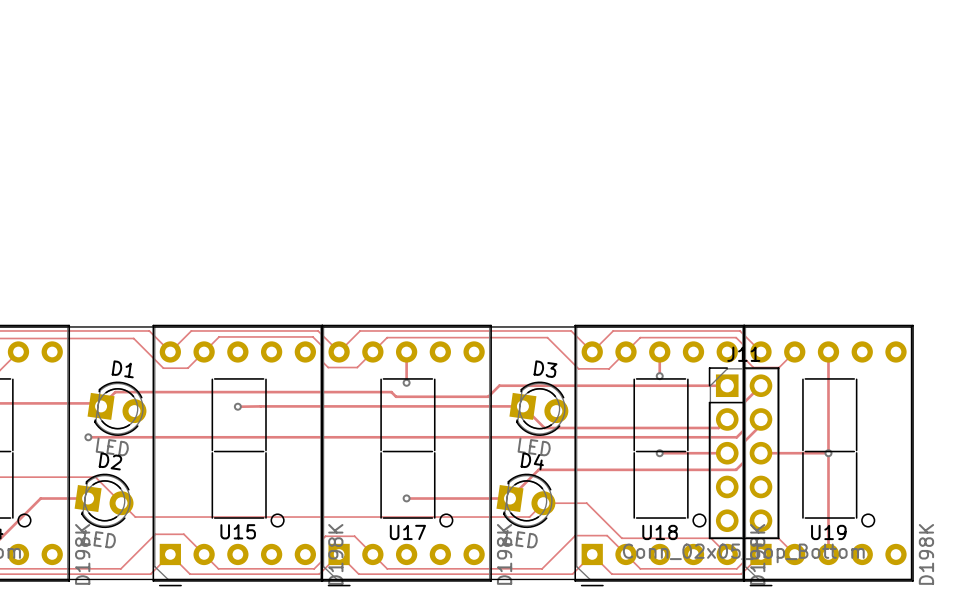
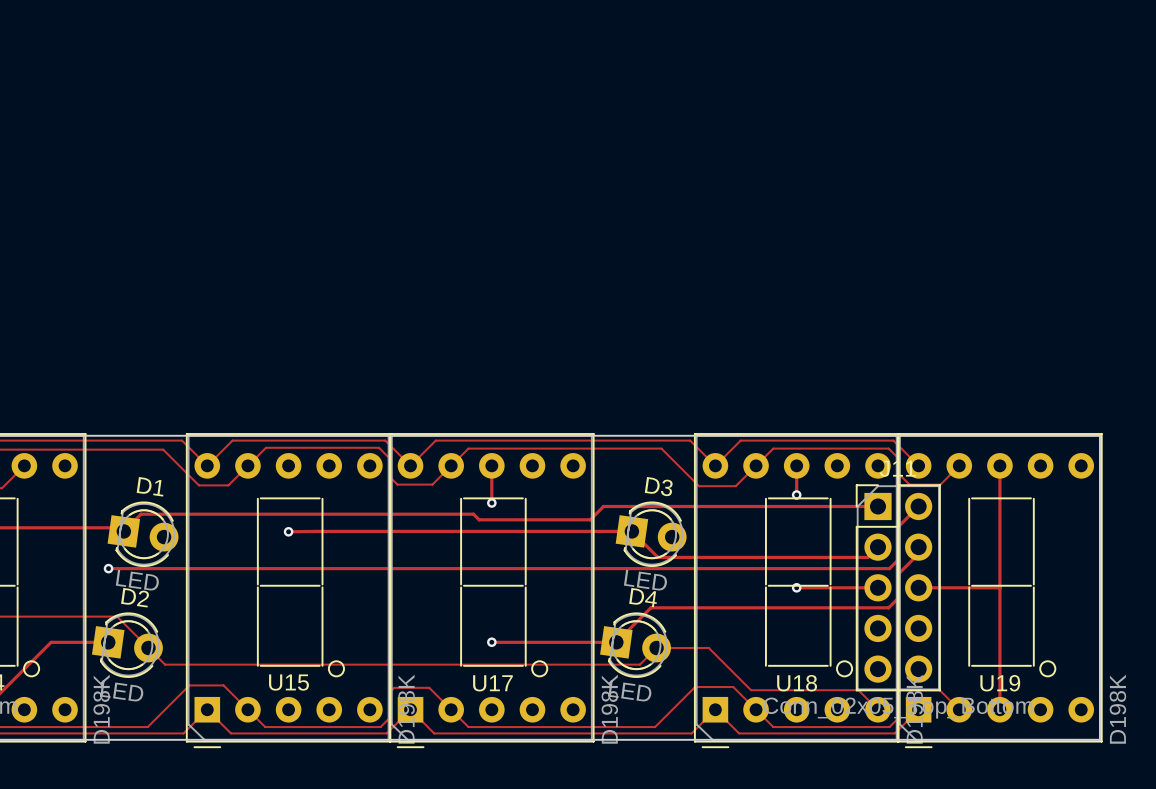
via: (828, 453) -> none

